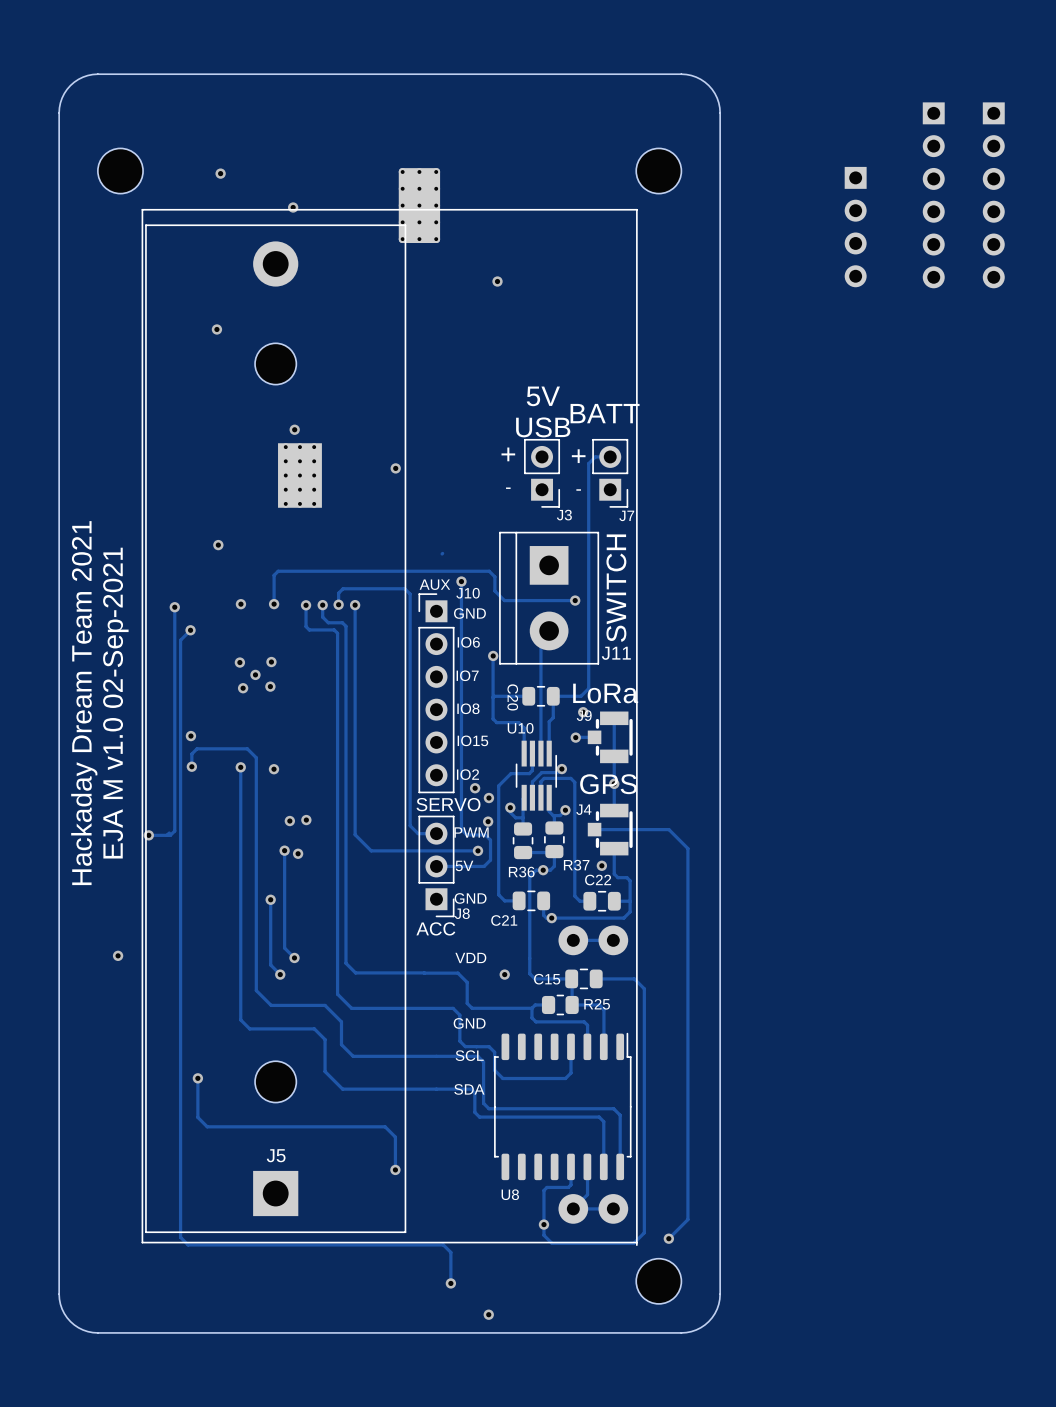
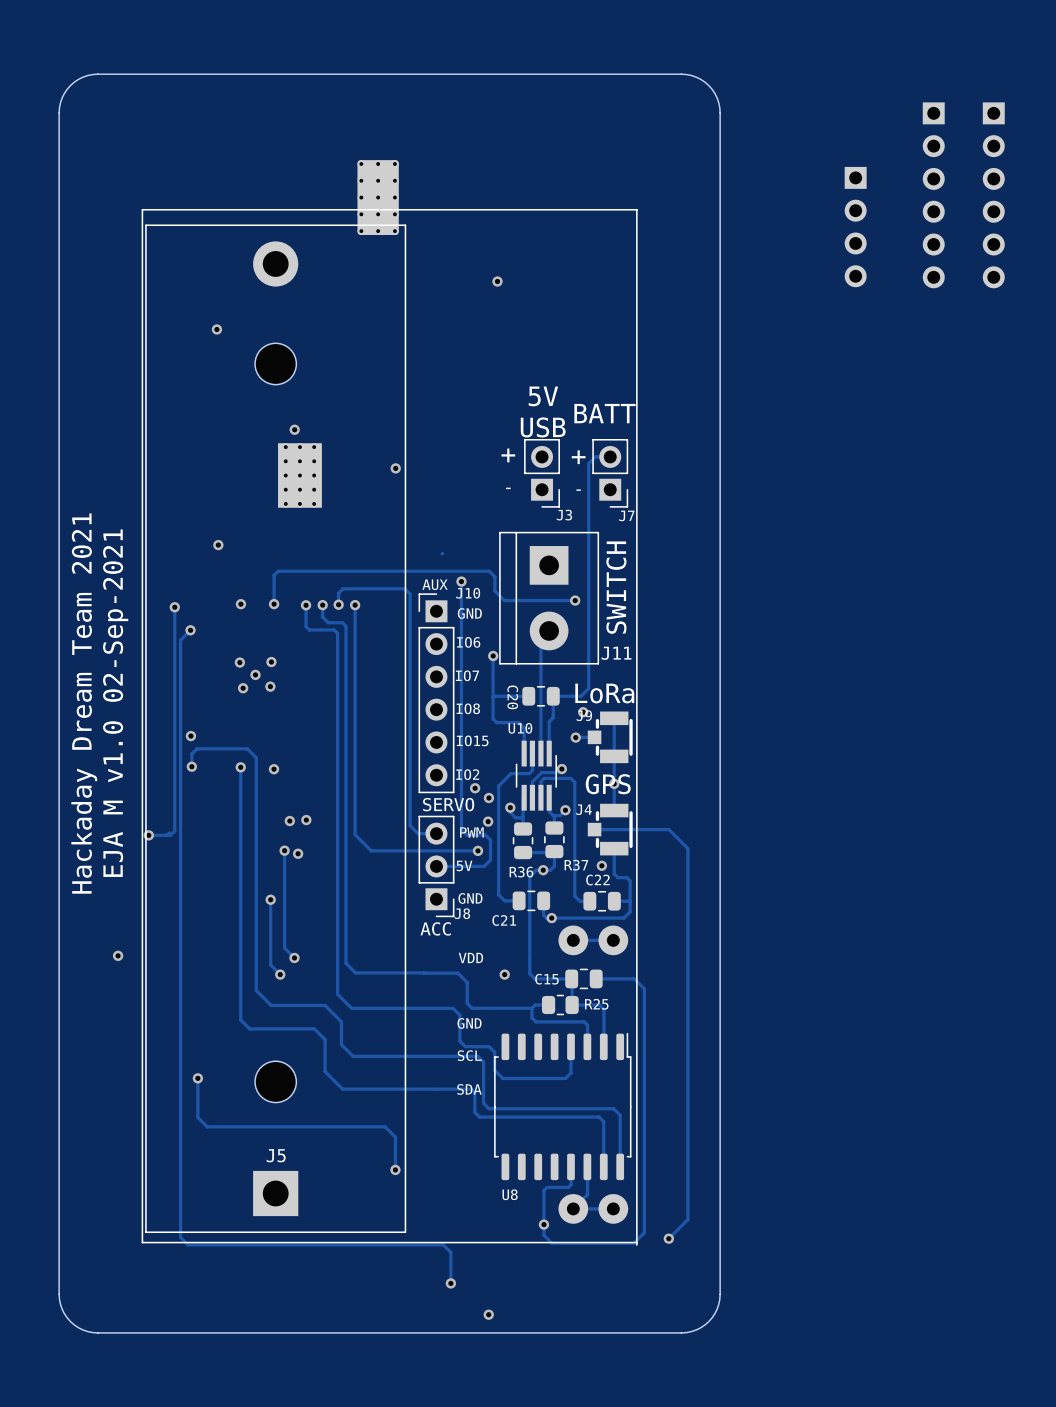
part: (120, 171) -> none
part: (658, 171) -> none
via: (220, 173) -> none
part position: (419, 205) -> (378, 197)
via: (293, 207) -> none
part: (658, 1281) -> none

